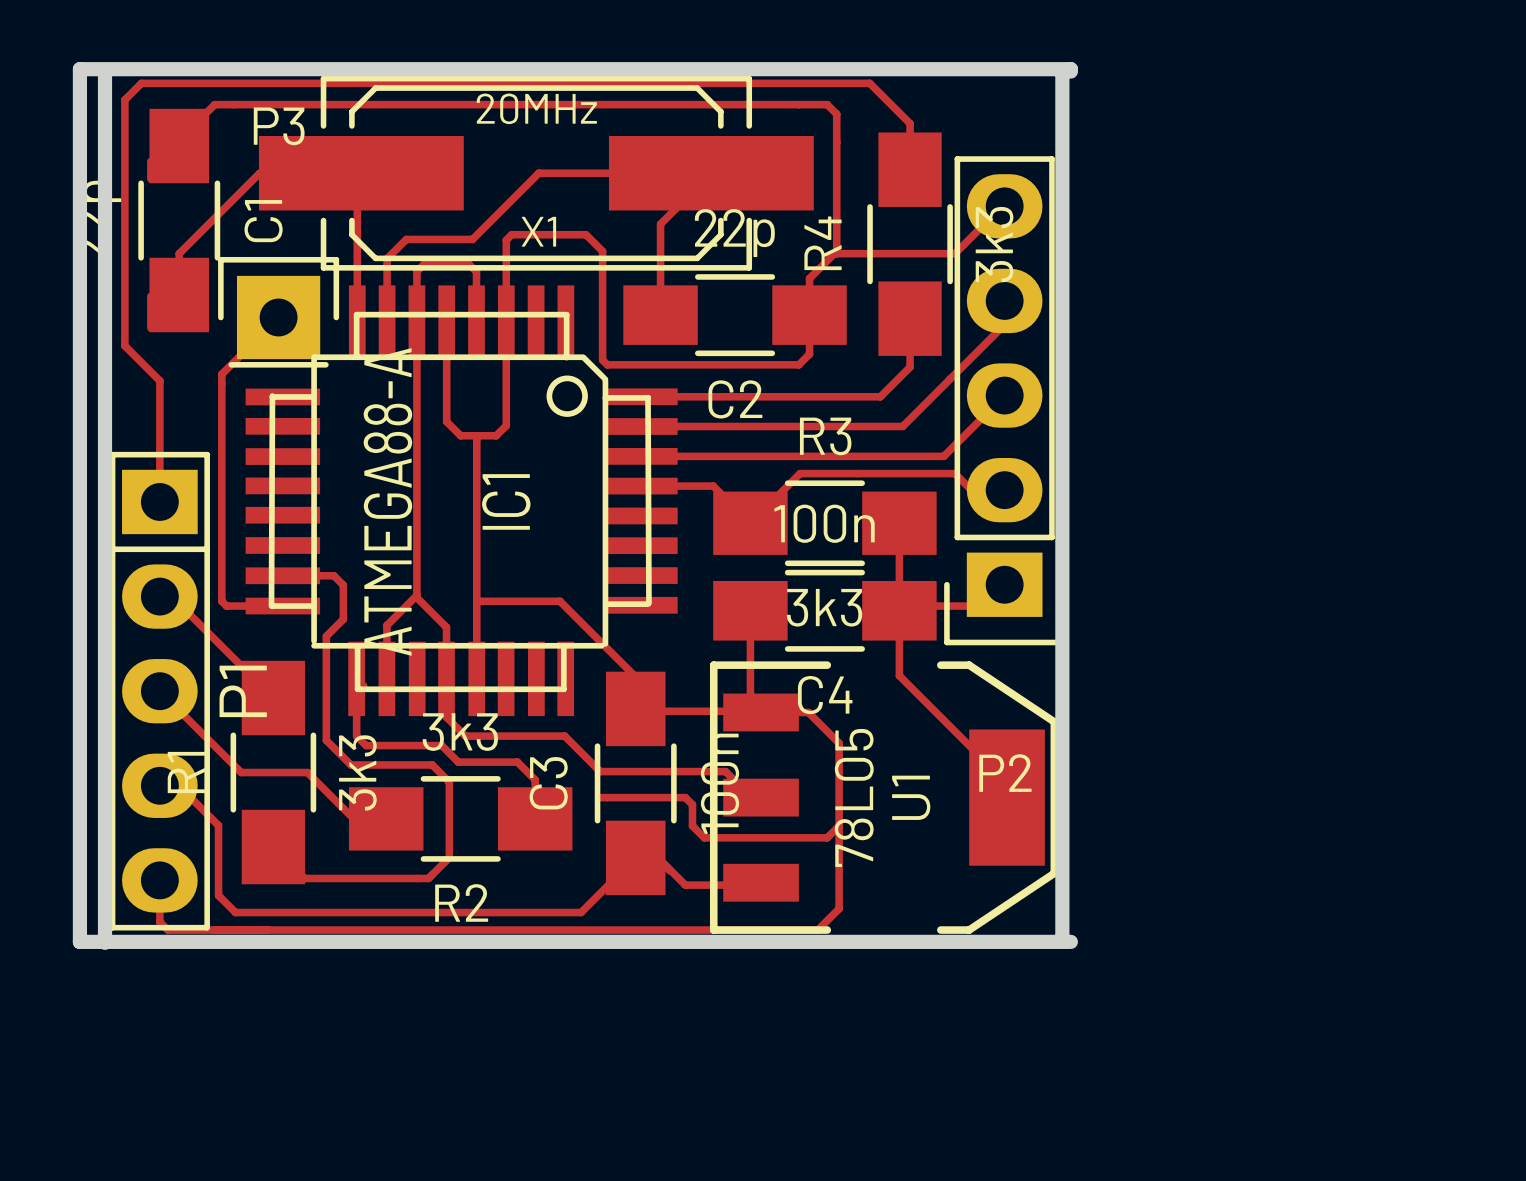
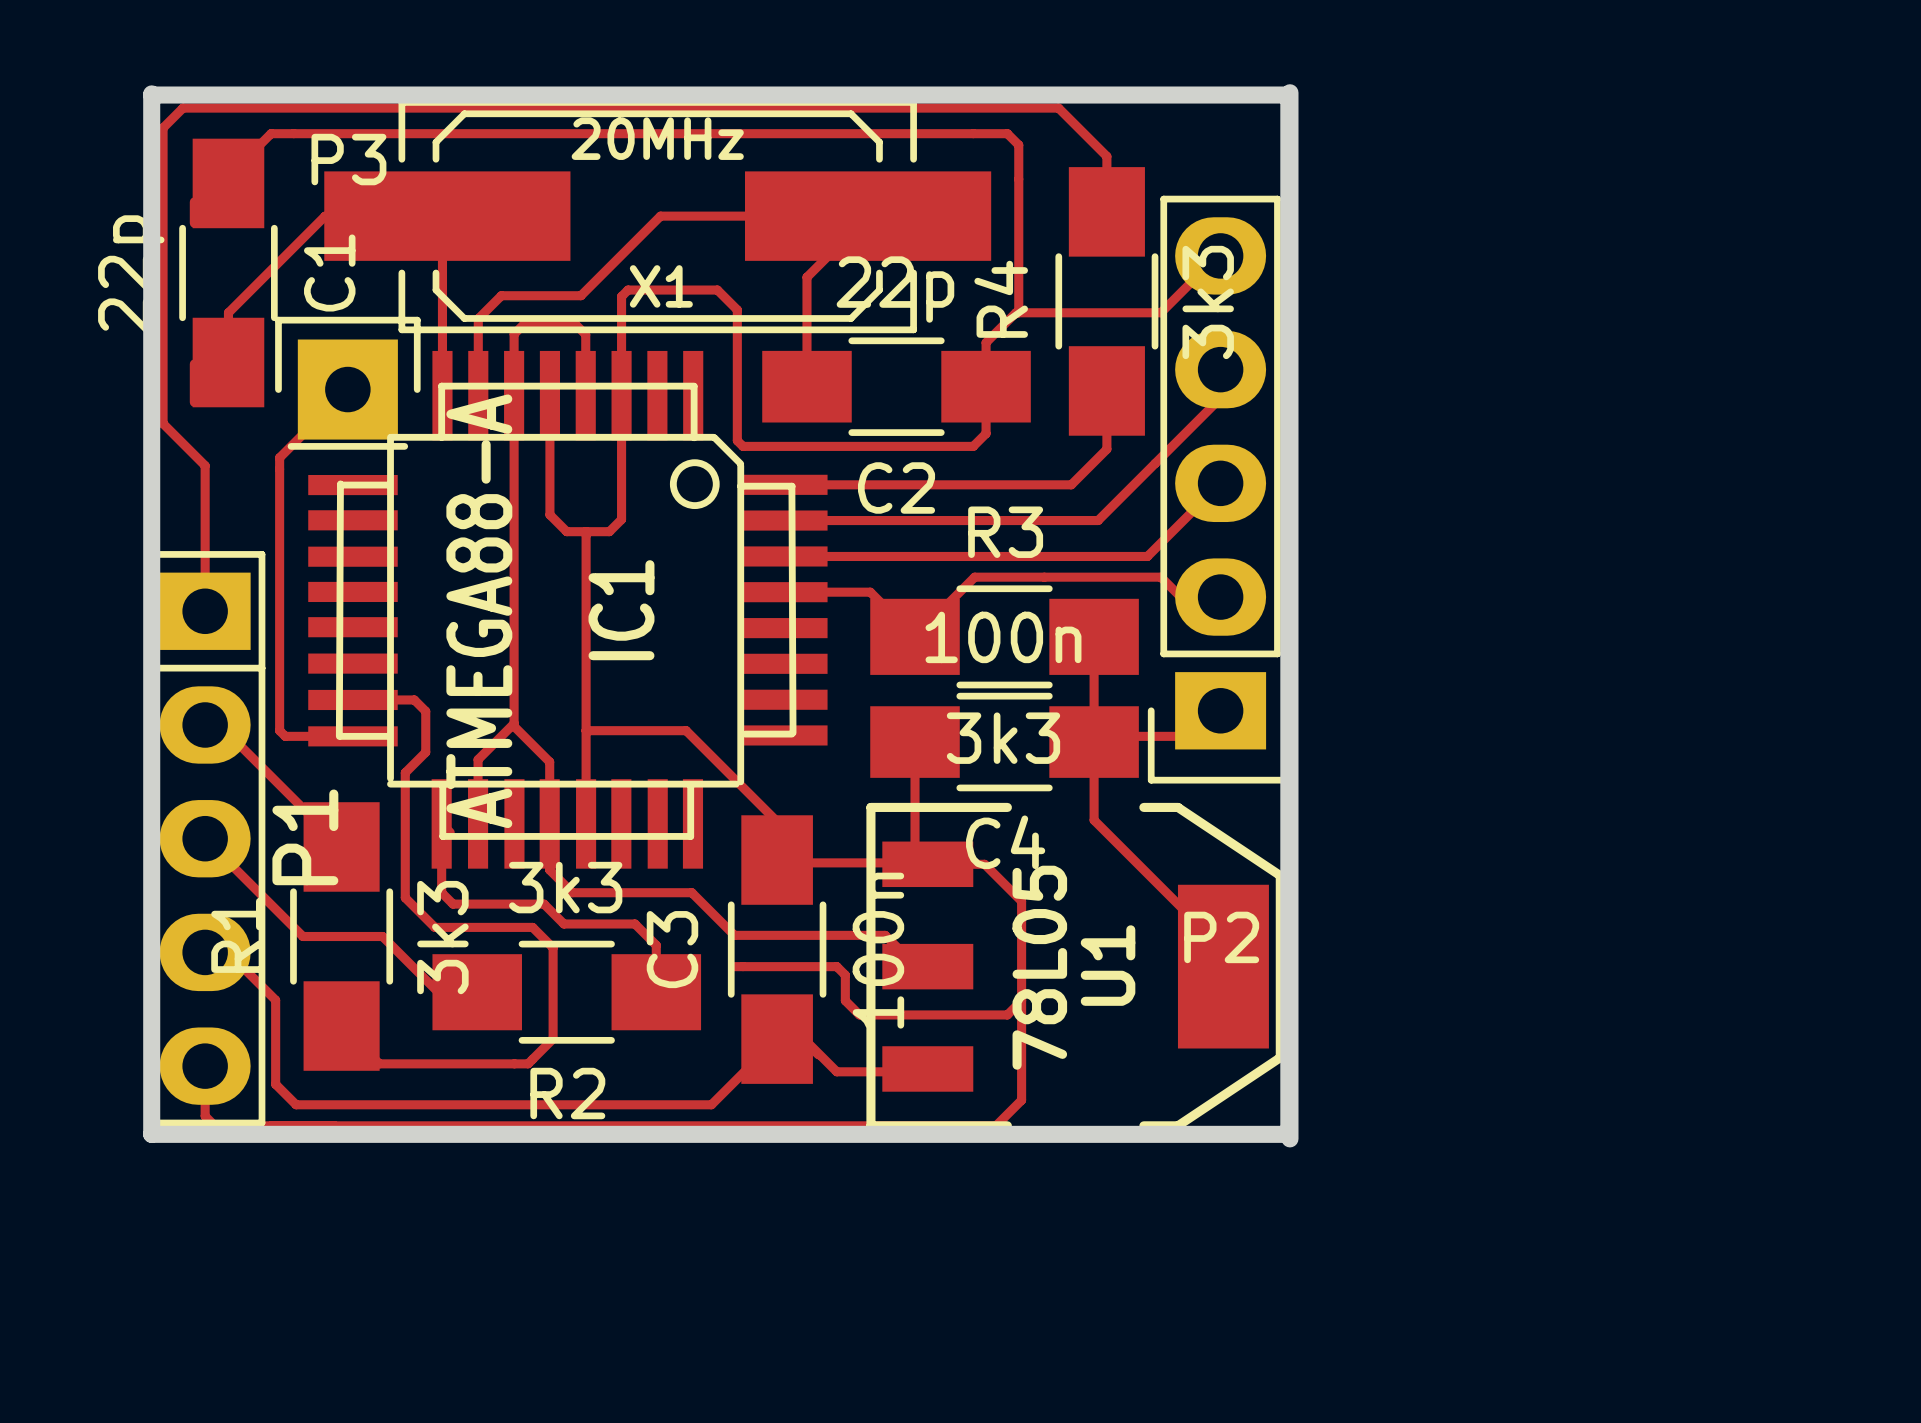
board edge: (106, 70) (105, 70) (105, 942) -> none
board edge: none -> (151, 93) (151, 1134) (1288, 1134) (1288, 95) (151, 95)
board edge: (1070, 71) (1070, 69) (79, 69) (79, 941) (1070, 941) -> none

